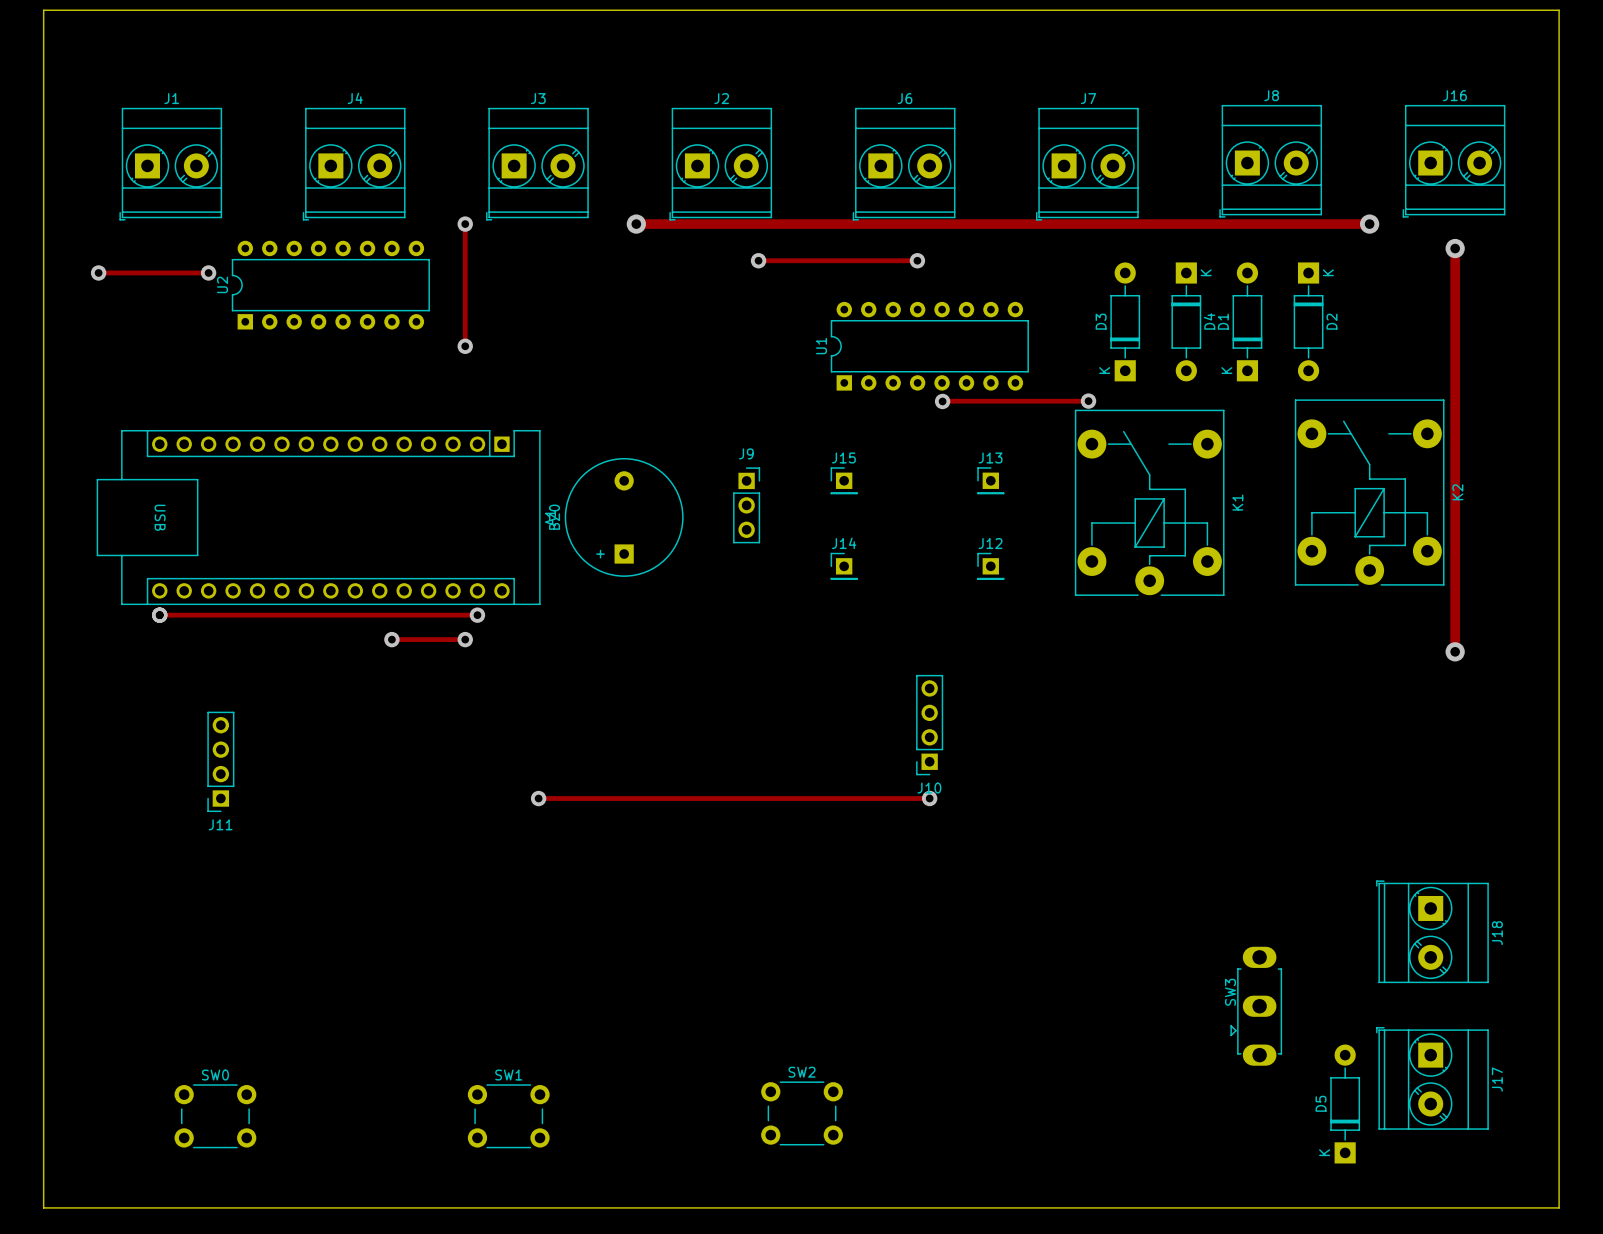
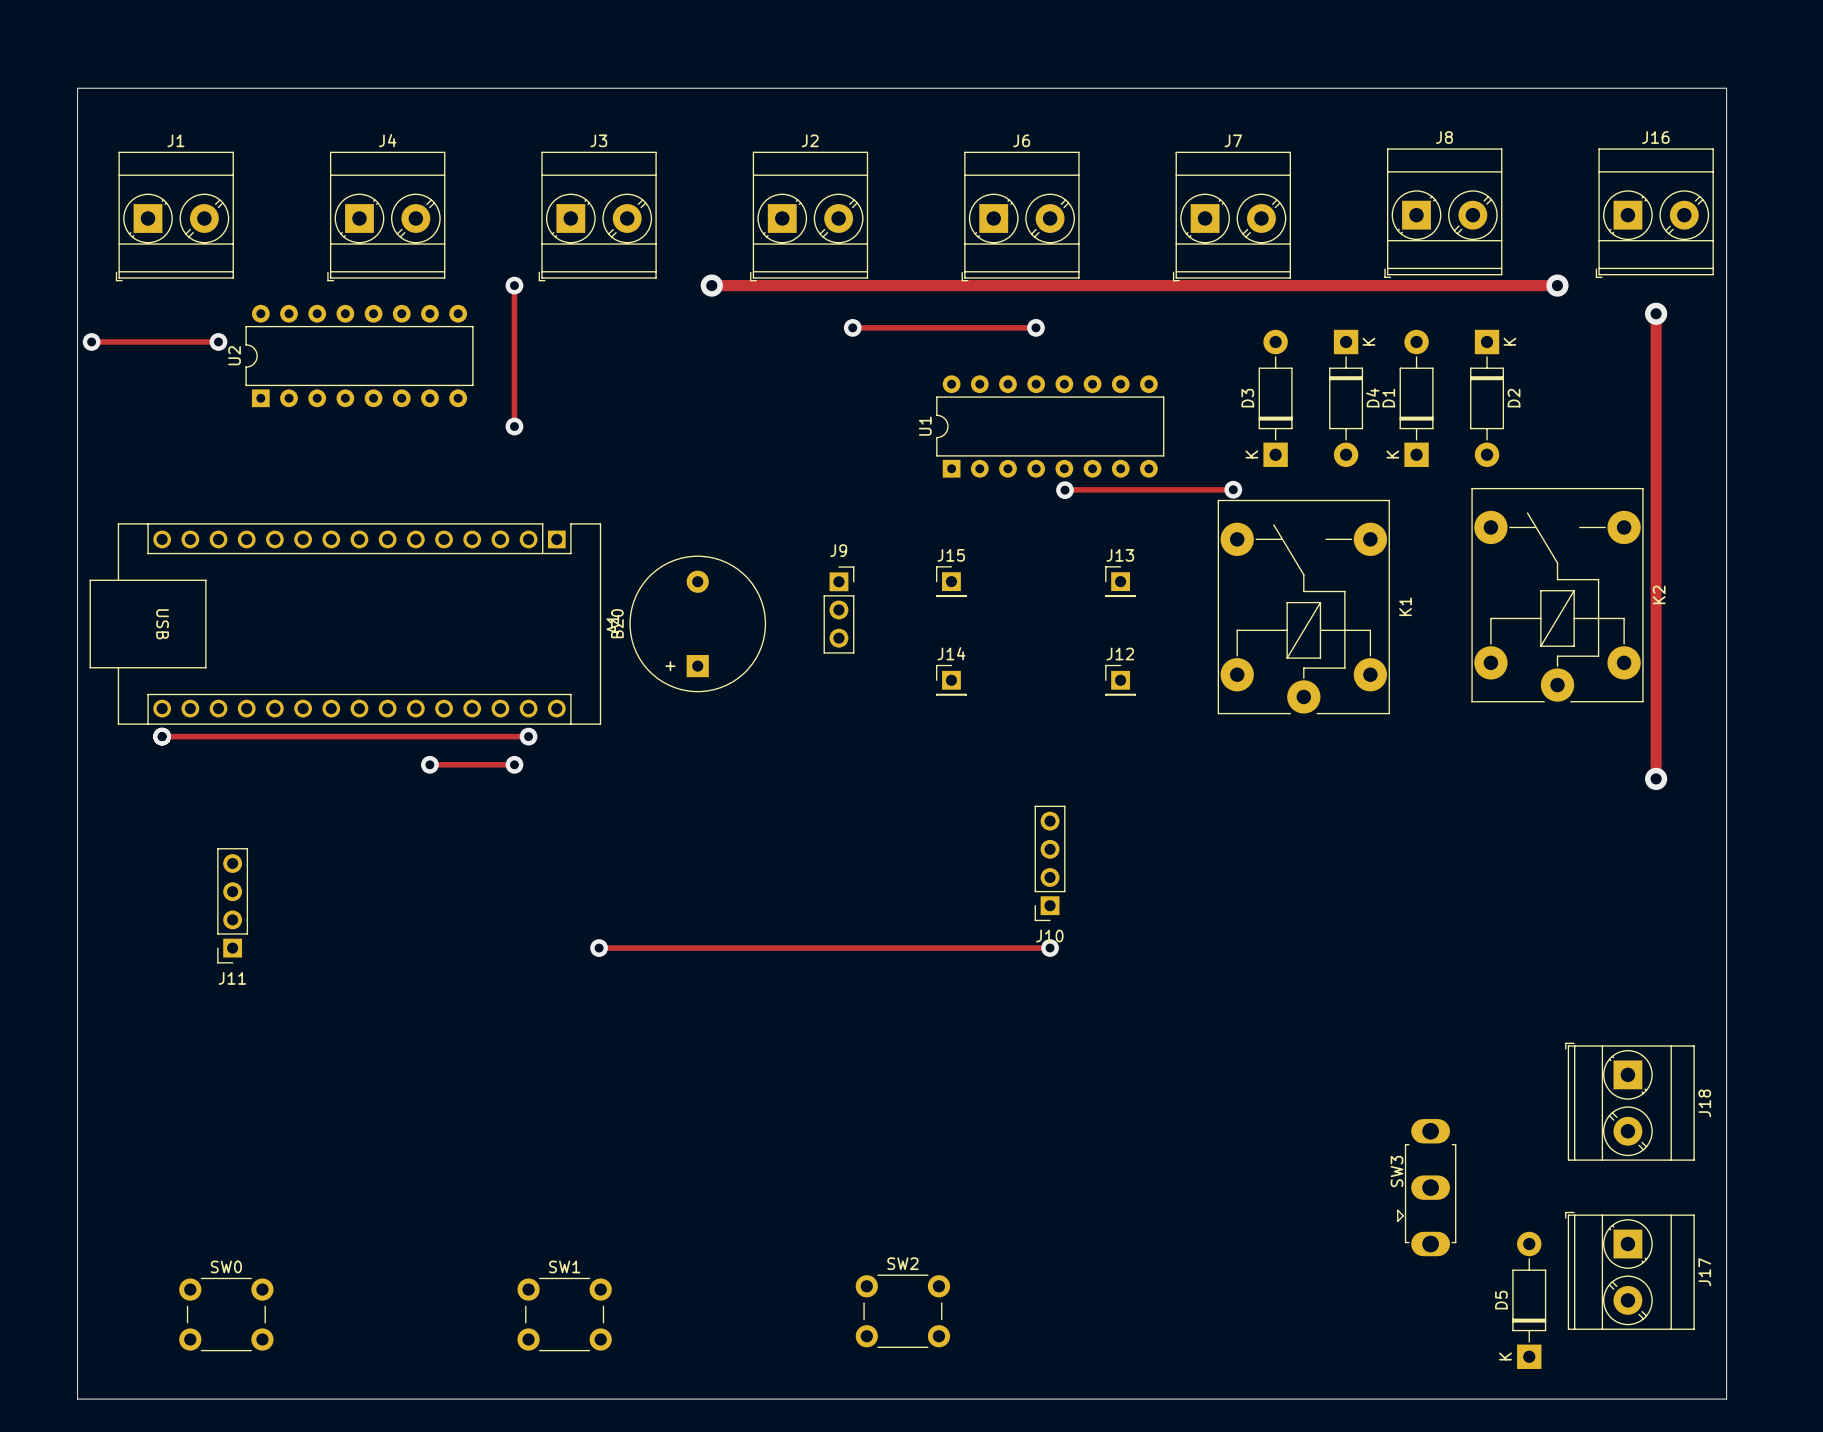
board edge: (43, 10) (1559, 10) (1559, 1207) (43, 1207) (43, 10) -> (77, 88) (77, 1399) (1726, 1399) (1726, 88) (77, 88)

